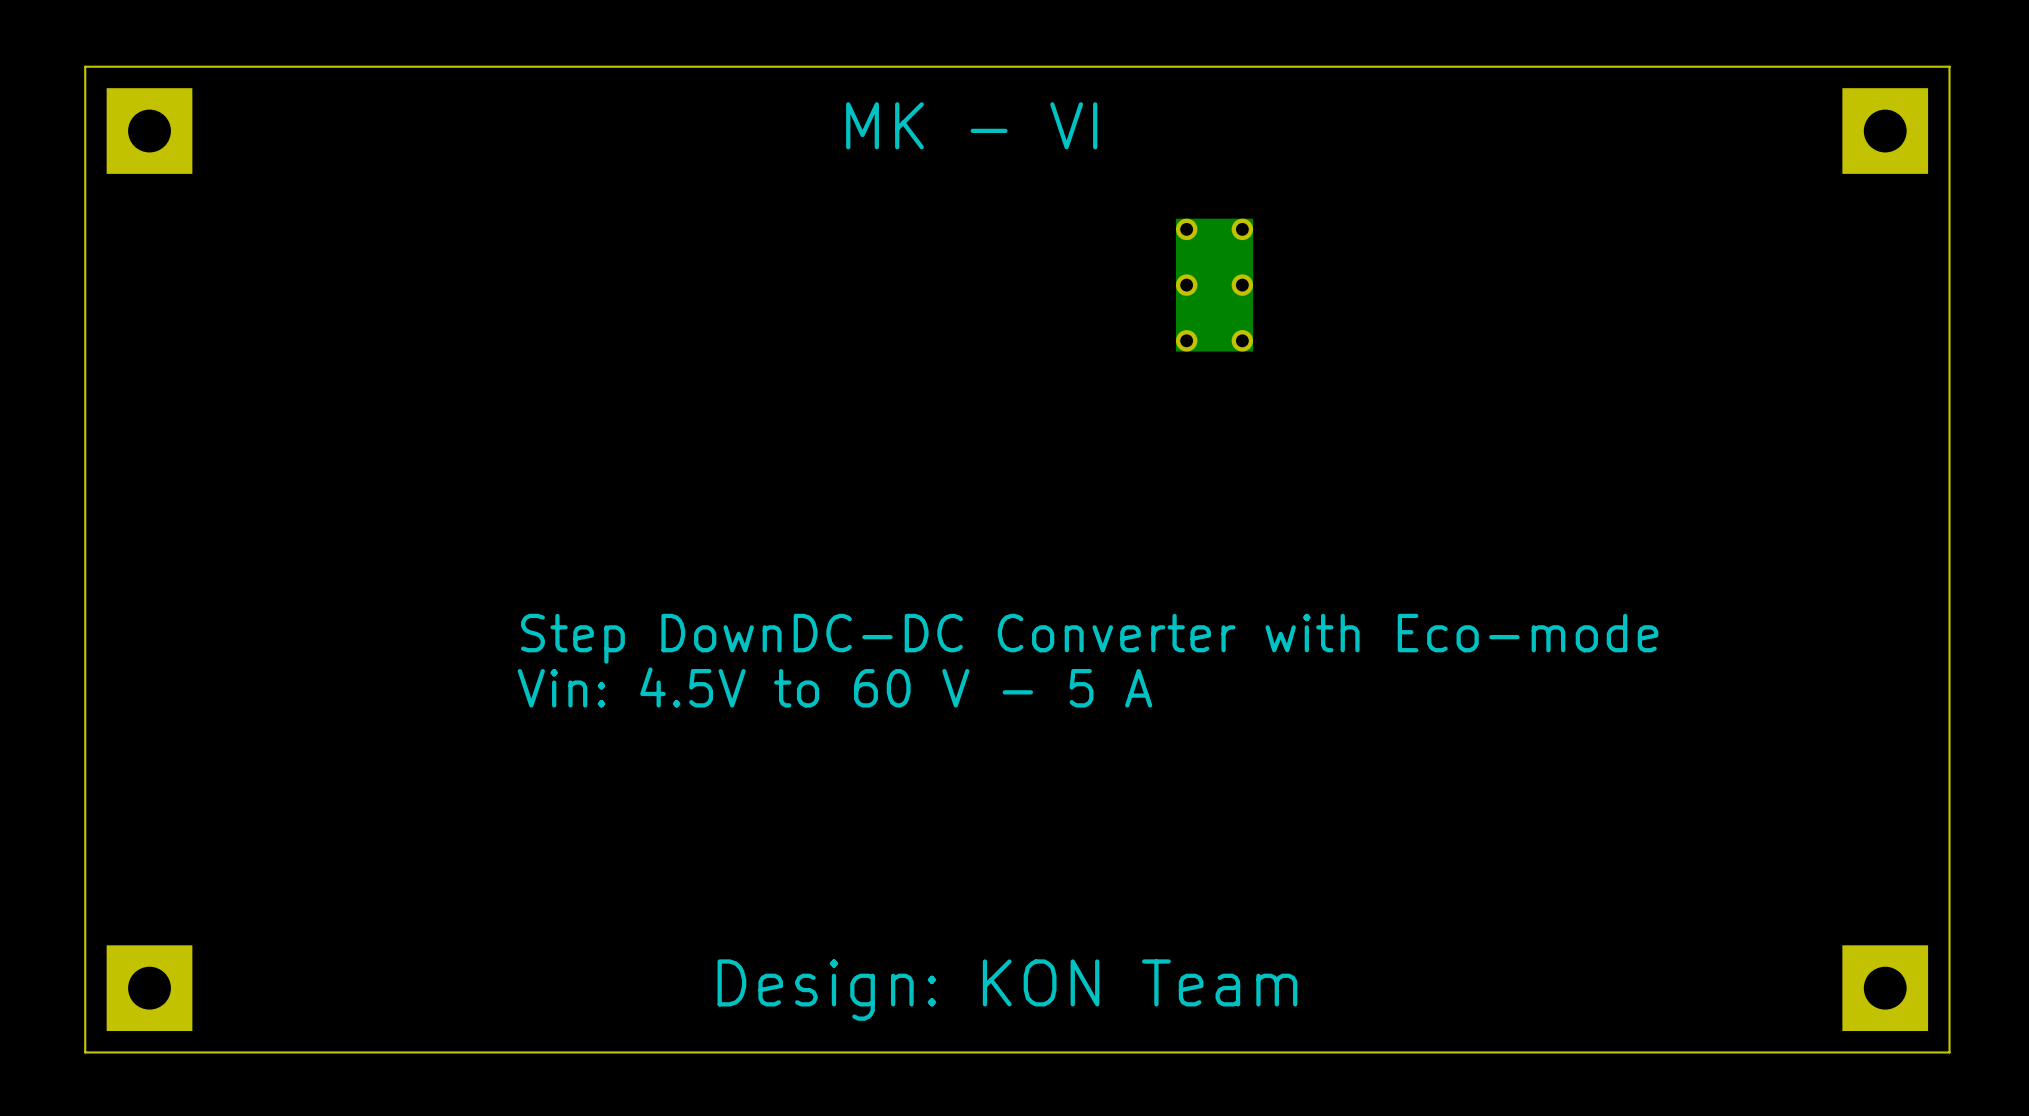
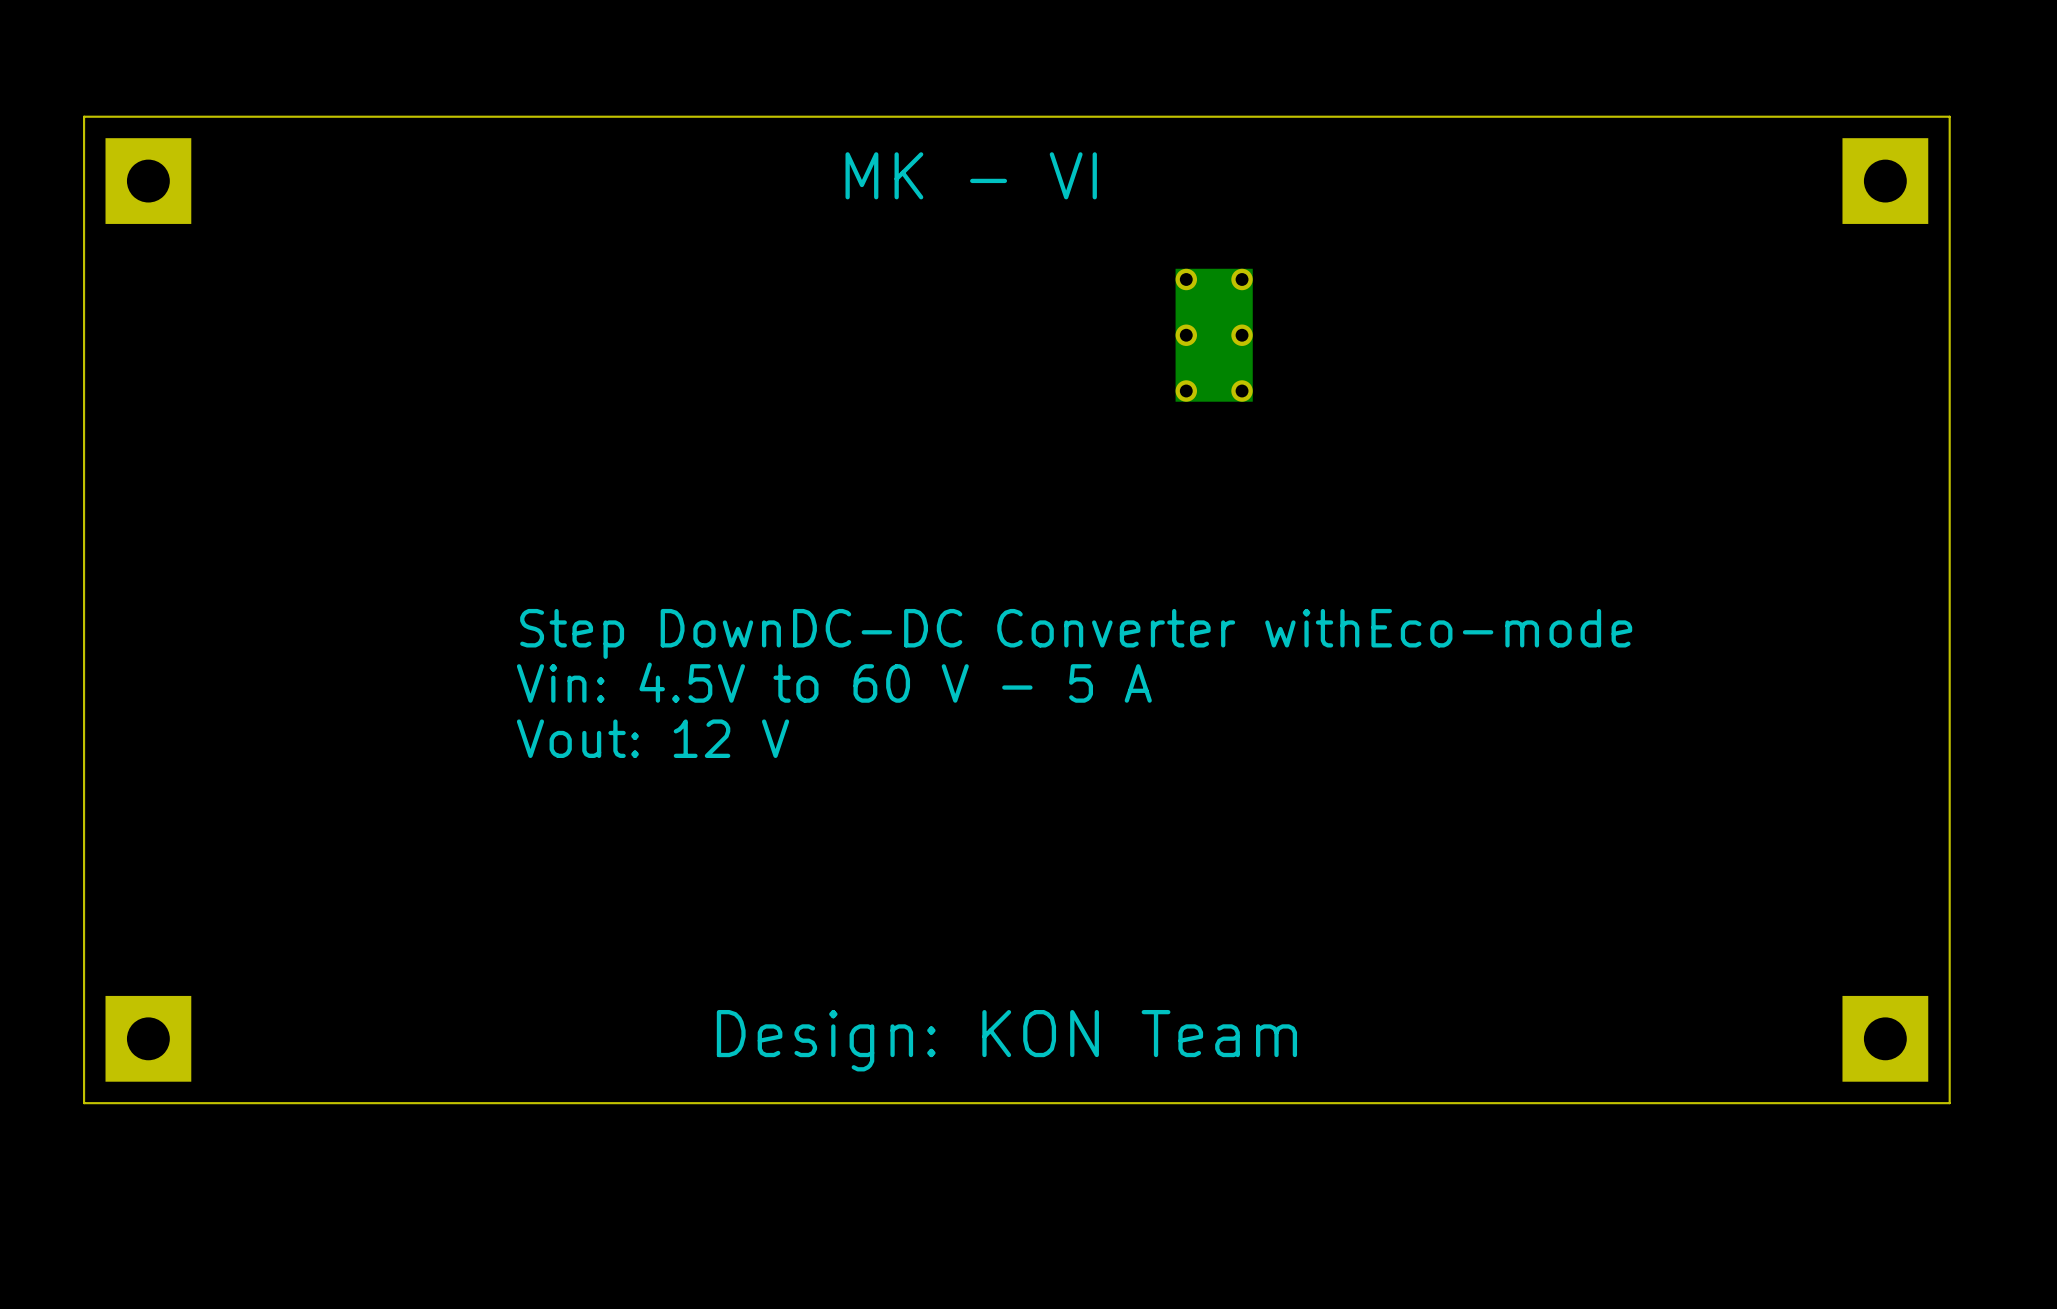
text: none -> Step DownDC-DC Converter withEco-mode (1076, 633)
text: Step DownDC-DC Converter with Eco-mode (1089, 638) -> Vin: 4.5V to 60 V - 5 A (834, 682)
text: Vin: 4.5V to 60 V - 5 A (834, 687) -> Vout: 12 V (653, 738)

